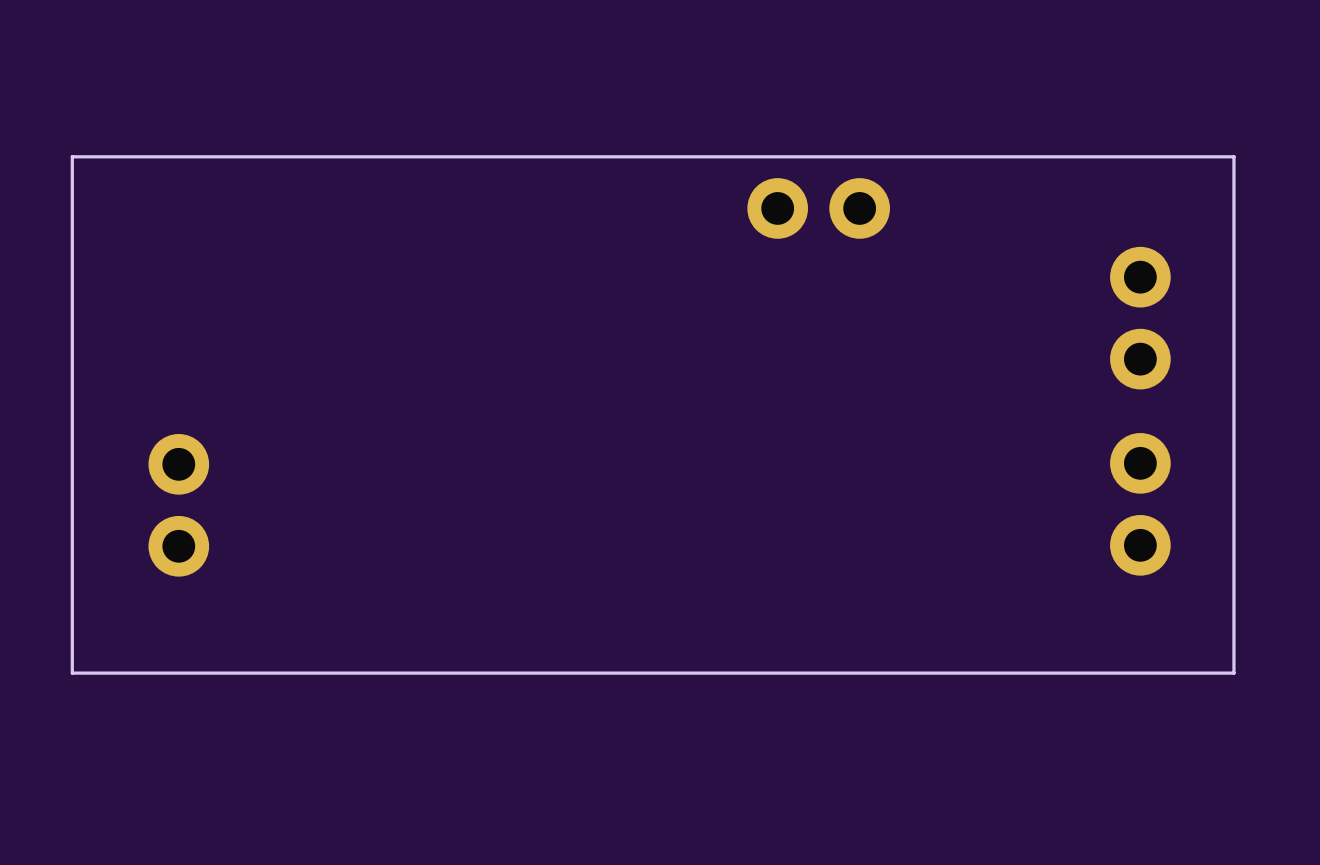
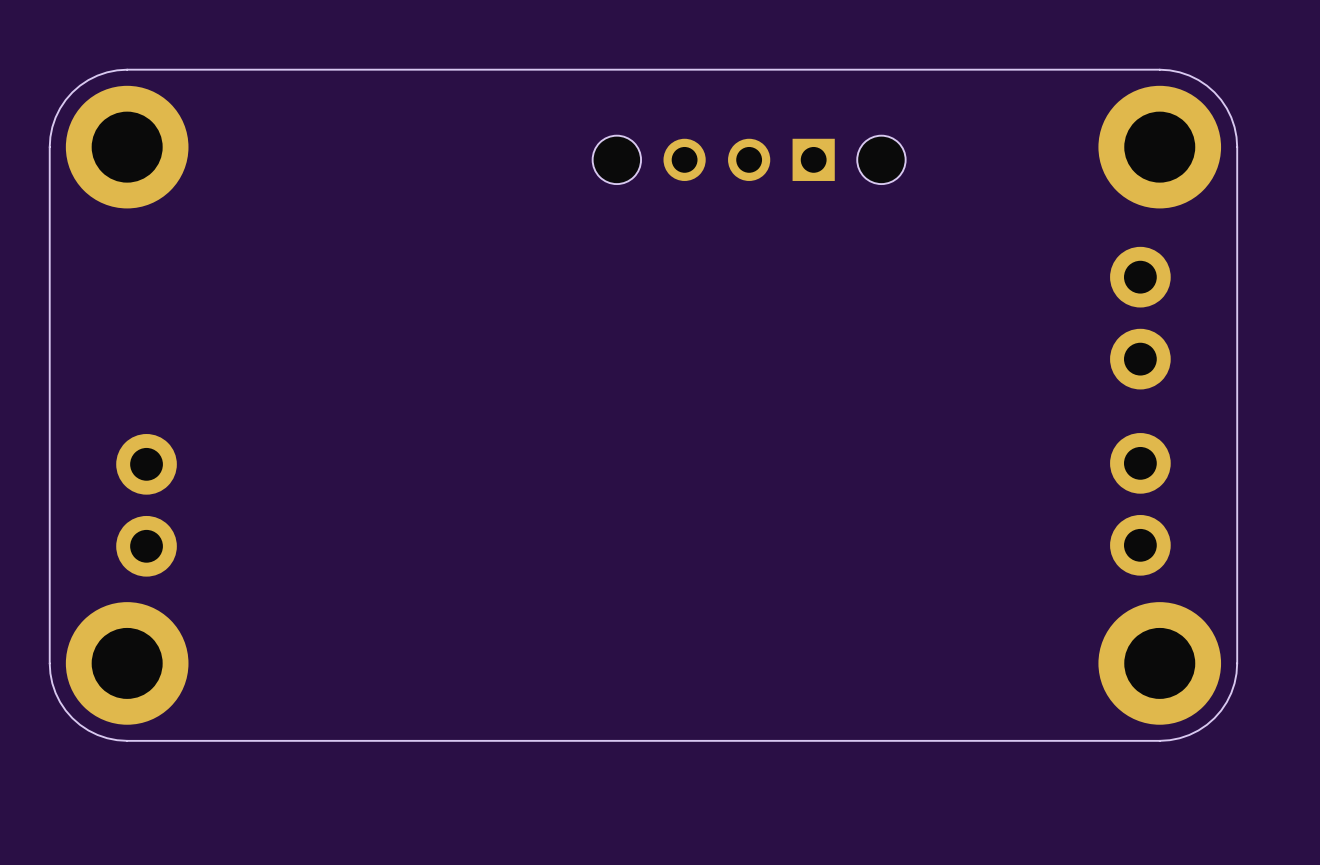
part: none -> (127, 147)
part: none -> (1159, 147)
board edge: (1233, 156) (1233, 673) (72, 673) (72, 156) (1233, 156) -> (1159, 69) (1189, 75) (1214, 92) (1231, 117) (1237, 147) (1236, 673) (1226, 702) (1214, 718) (1198, 730) (1179, 738) (1159, 740) (127, 740) (107, 738) (88, 730) (72, 718) (60, 702) (52, 683) (49, 663) (49, 147) (52, 127) (60, 108) (72, 92) (88, 80) (107, 72) (127, 69) (1159, 69)
part: none -> (749, 159)
part: (818, 208) -> none
part position: (178, 505) -> (146, 505)
part: none -> (127, 663)
part: none -> (1159, 663)

